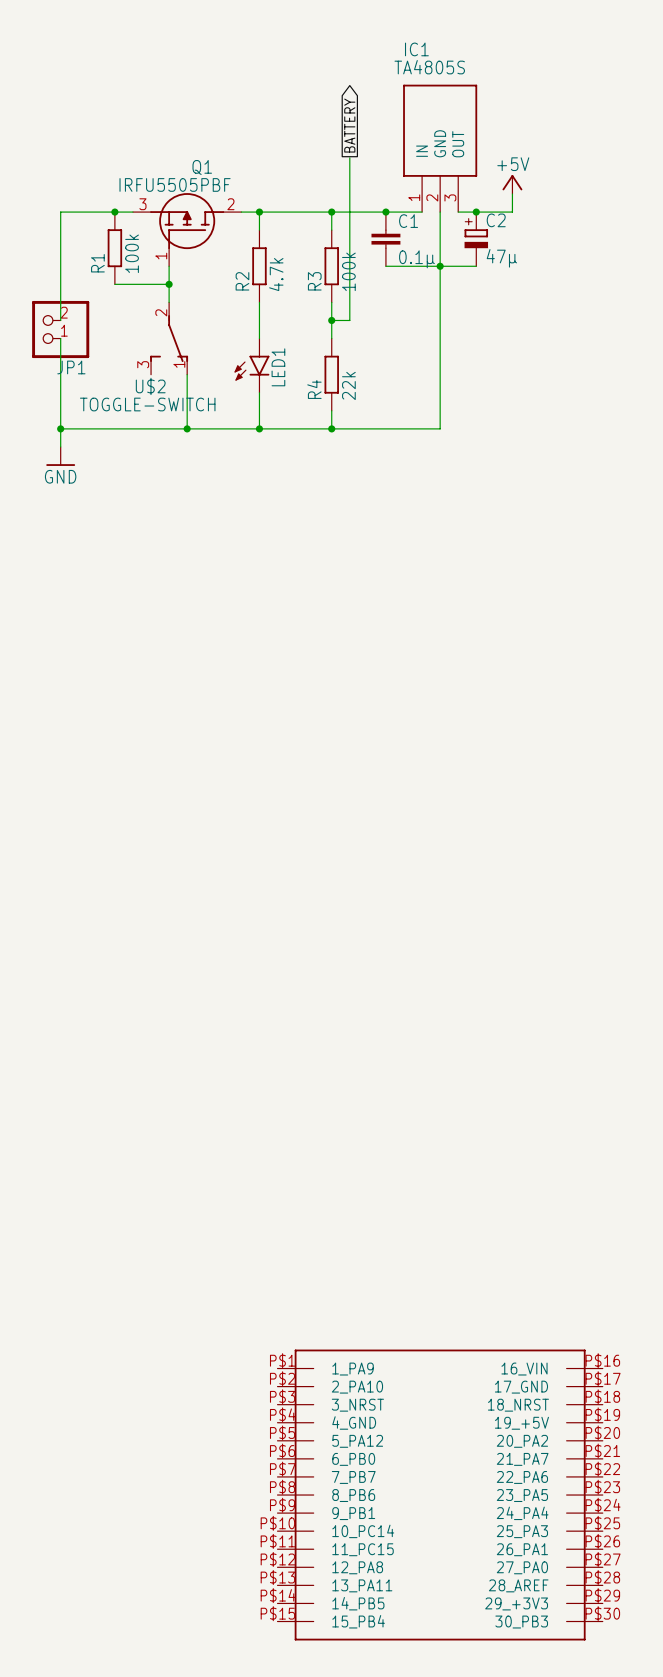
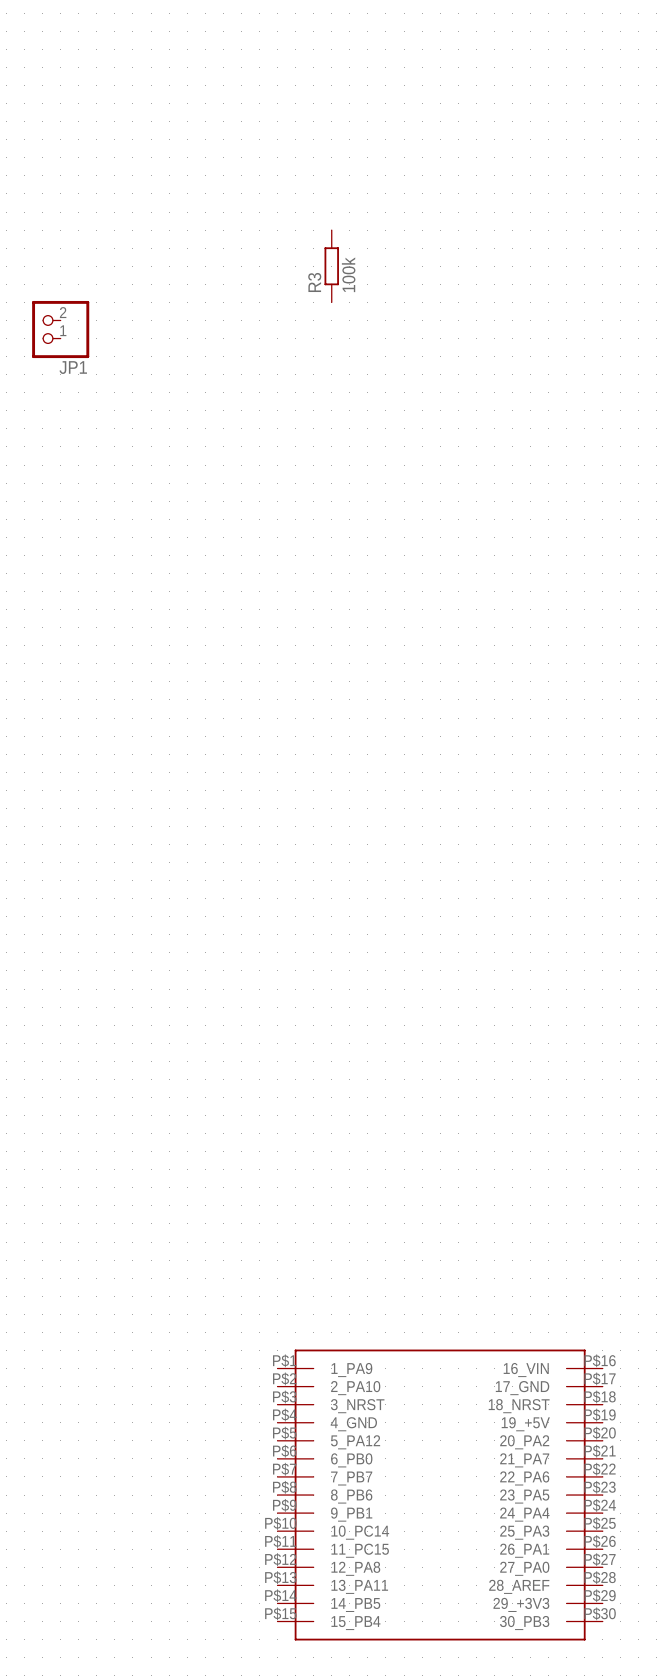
global label: BATTERY (349, 125) -> none
IC1: TA4805S (440, 148) -> none
wire: (349, 157) (349, 320) (331, 320) -> none
power symbol: +5V (512, 184) -> none
wire: (512, 193) (512, 212) (458, 212) -> none
junction: (114, 212) -> none
wire: (132, 212) (60, 212) (60, 320) -> none
wire: (241, 212) (422, 212) -> none
wire: (259, 212) (259, 230) -> none
junction: (259, 212) -> none
wire: (331, 212) (331, 230) -> none
junction: (331, 212) -> none
junction: (385, 212) -> none
wire: (440, 212) (440, 428) (60, 428) -> none
junction: (476, 212) -> none
Q1: IRFU5505PBF (187, 229) -> none
C1: 0.1μ (385, 239) -> none
C2: 47μ (476, 239) -> none
R1: 100k (114, 248) -> none
wire: (169, 266) (169, 302) -> none
R2: 4.7k (259, 266) -> none
wire: (385, 266) (476, 266) -> none
junction: (440, 266) -> none
wire: (114, 284) (169, 284) -> none
junction: (169, 284) -> none
wire: (259, 302) (259, 338) -> none
wire: (331, 302) (331, 338) -> none
junction: (331, 320) -> none
wire: (60, 338) (60, 446) -> none
U$2: TOGGLE-SWITCH (169, 338) -> none
LED1: (251, 365) -> none
wire: (187, 374) (187, 428) -> none
R4: 22k (331, 374) -> none
wire: (259, 392) (259, 428) -> none
wire: (331, 410) (331, 428) -> none
junction: (60, 428) -> none
junction: (187, 428) -> none
junction: (259, 428) -> none
junction: (331, 428) -> none
power symbol: GND (60, 456) -> none

